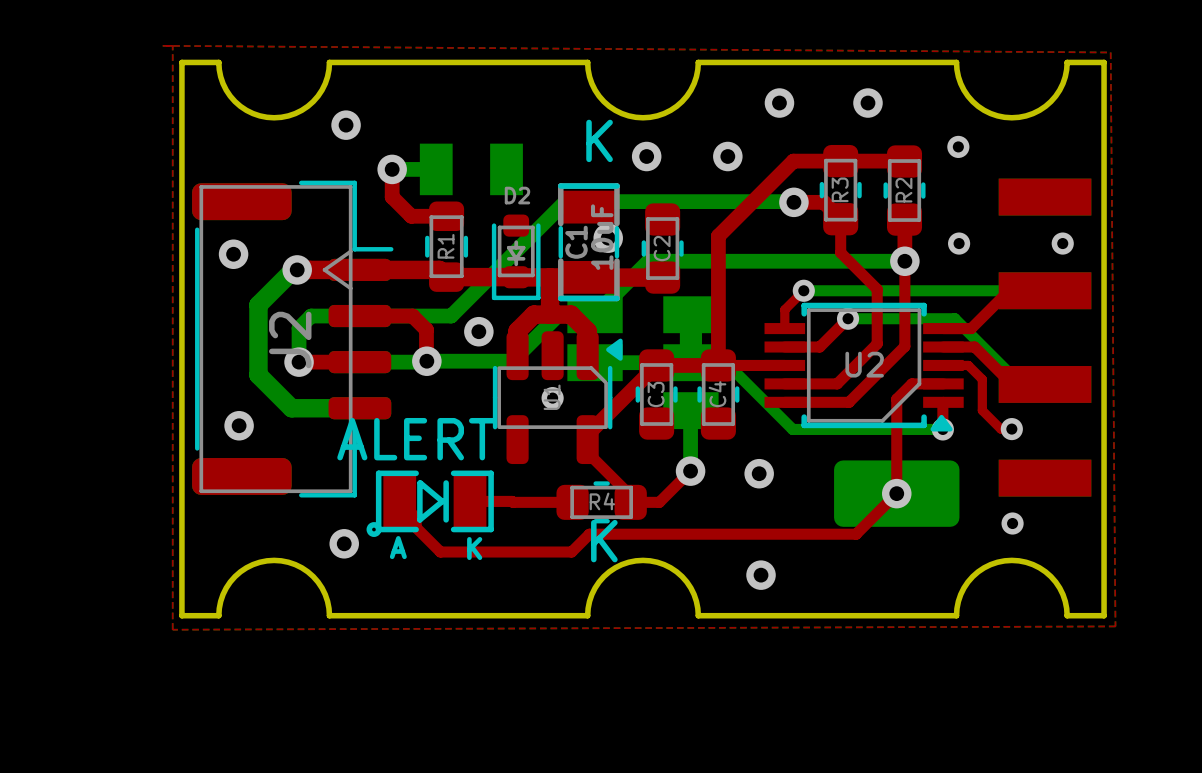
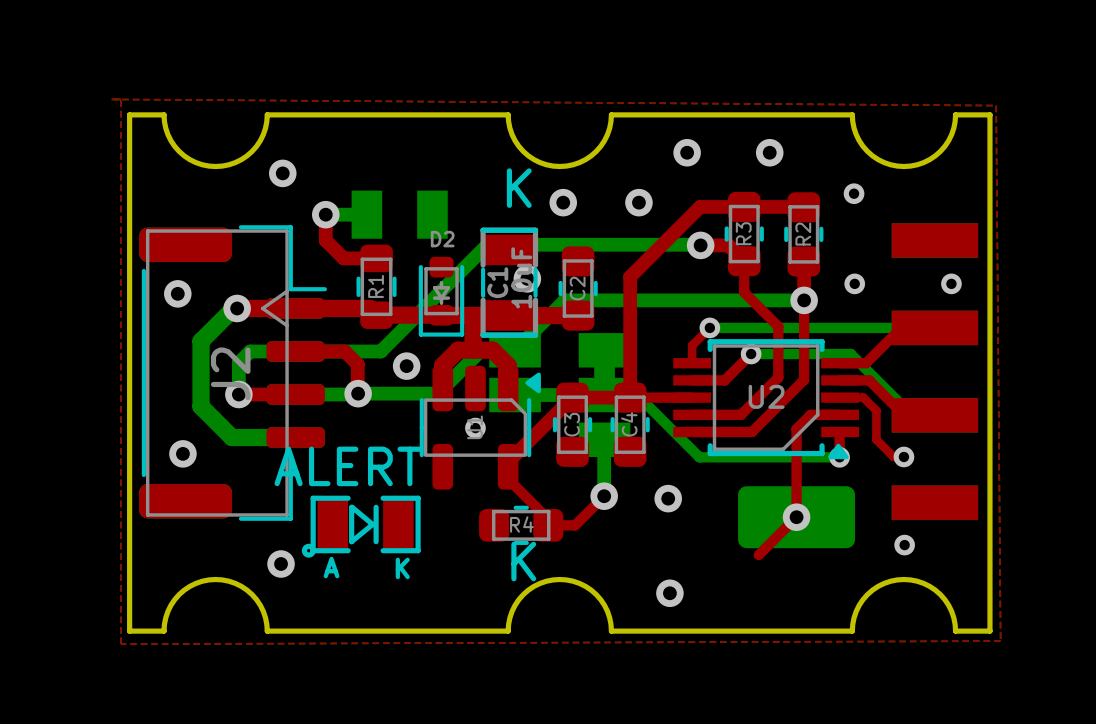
top track: (399, 501) (416, 517) (416, 527) (440, 552) (571, 552) (589, 534) (856, 534) -> none
top track: (470, 501) (572, 502) -> none

